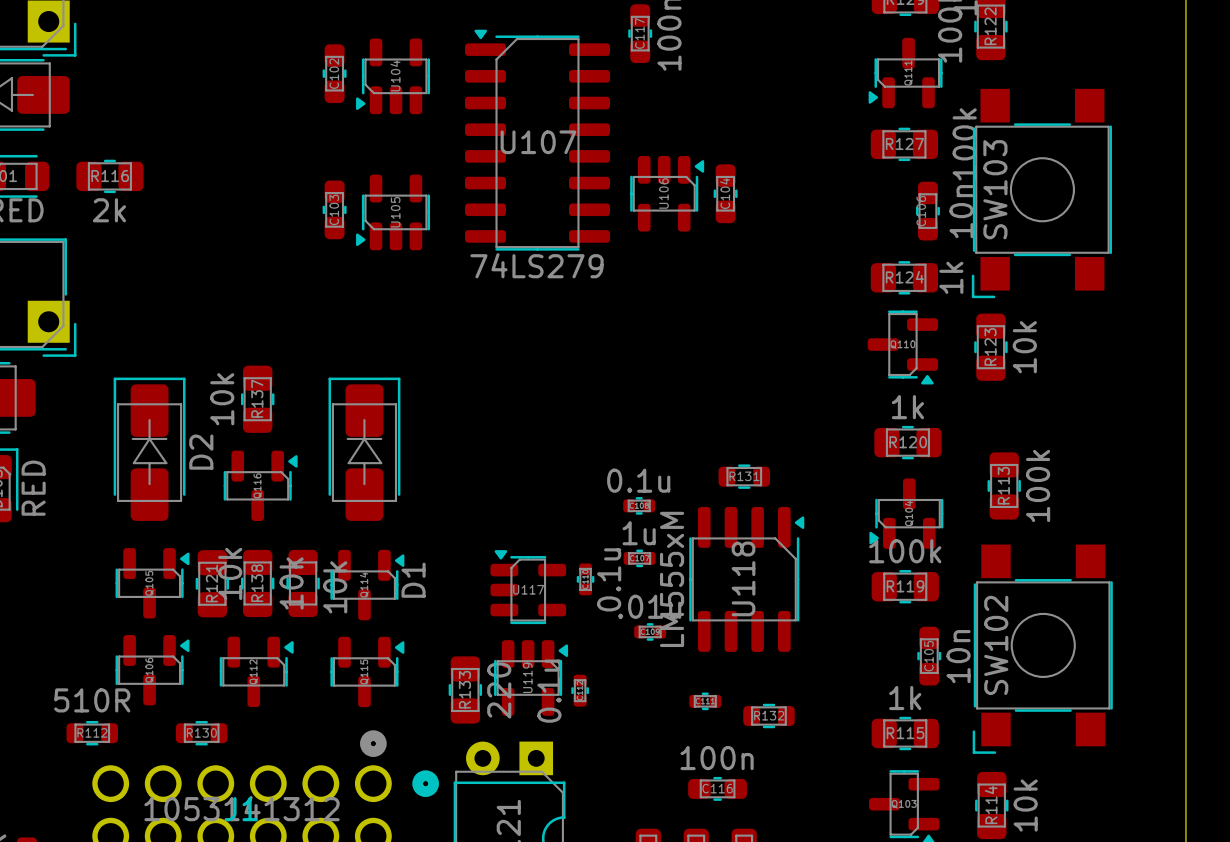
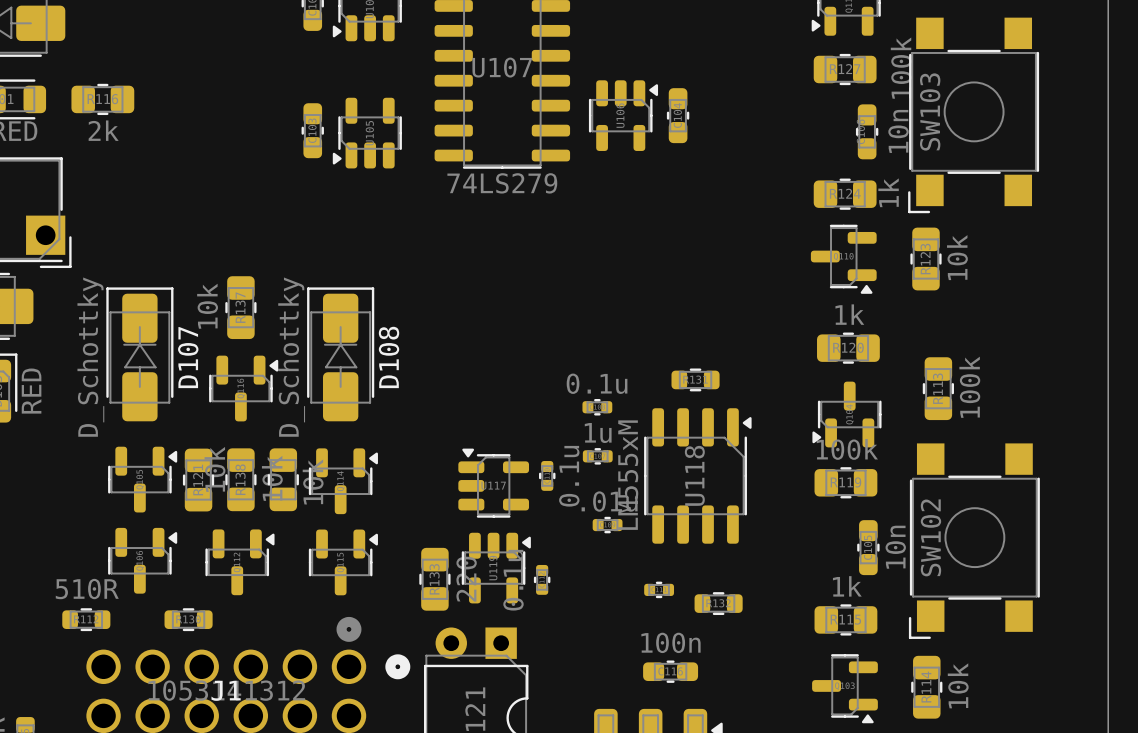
D2 value: none -> D_Schottky (90, 357)
D1 value: none -> D_Schottky (291, 357)
D2 name: D2 (201, 452) -> D107 (188, 357)
D1 name: D1 (413, 580) -> D108 (389, 357)

